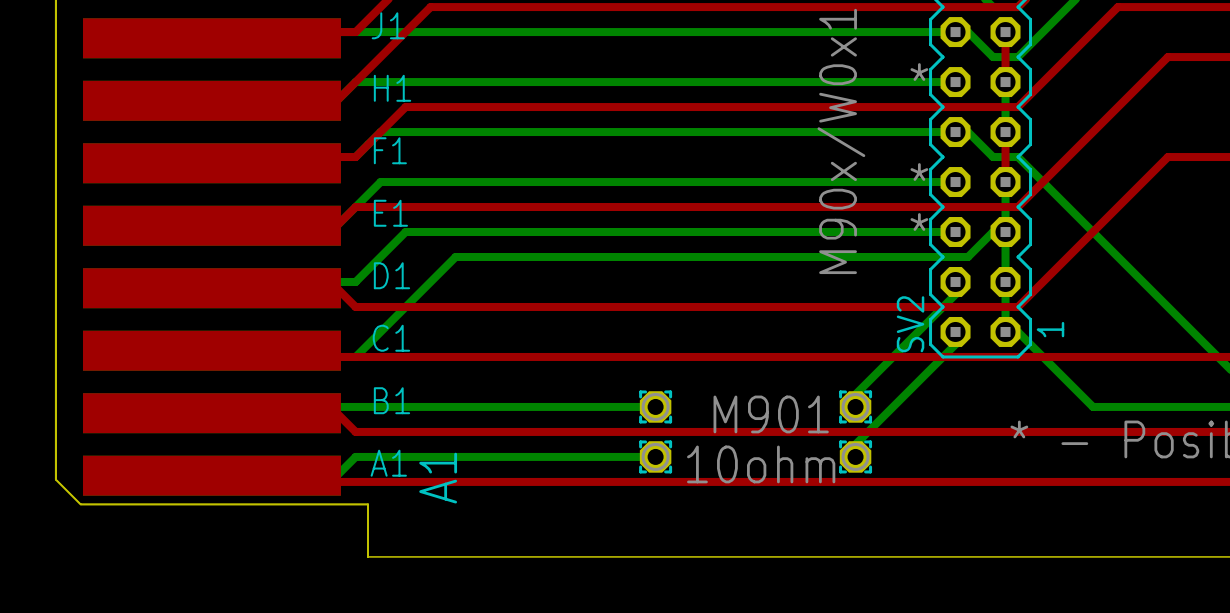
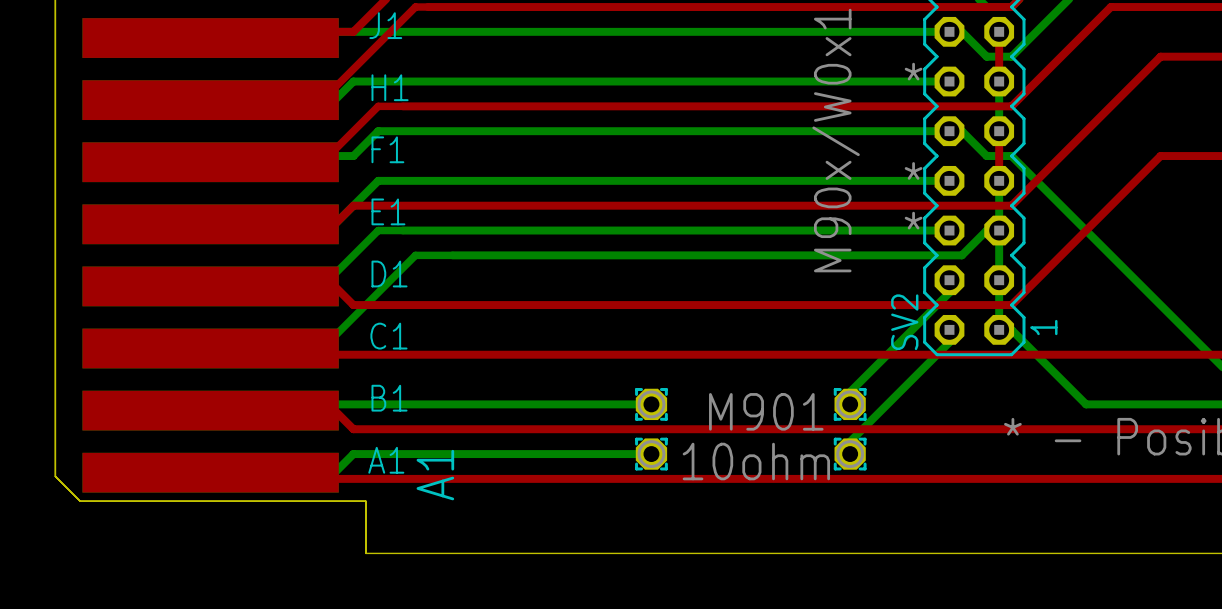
top track: (430, 7) (330, 107) (211, 100) -> (427, 7) (415, 7) (328, 93) (210, 100)
top track: (405, 107) (355, 157) (330, 157) -> (403, 106) (378, 106) (328, 156)
bottom track: (405, 232) (355, 281) (330, 281) -> (403, 230) (378, 230) (328, 280)
bottom track: (455, 256) (355, 356) (211, 350) -> (452, 255) (415, 255) (328, 342) (210, 348)

